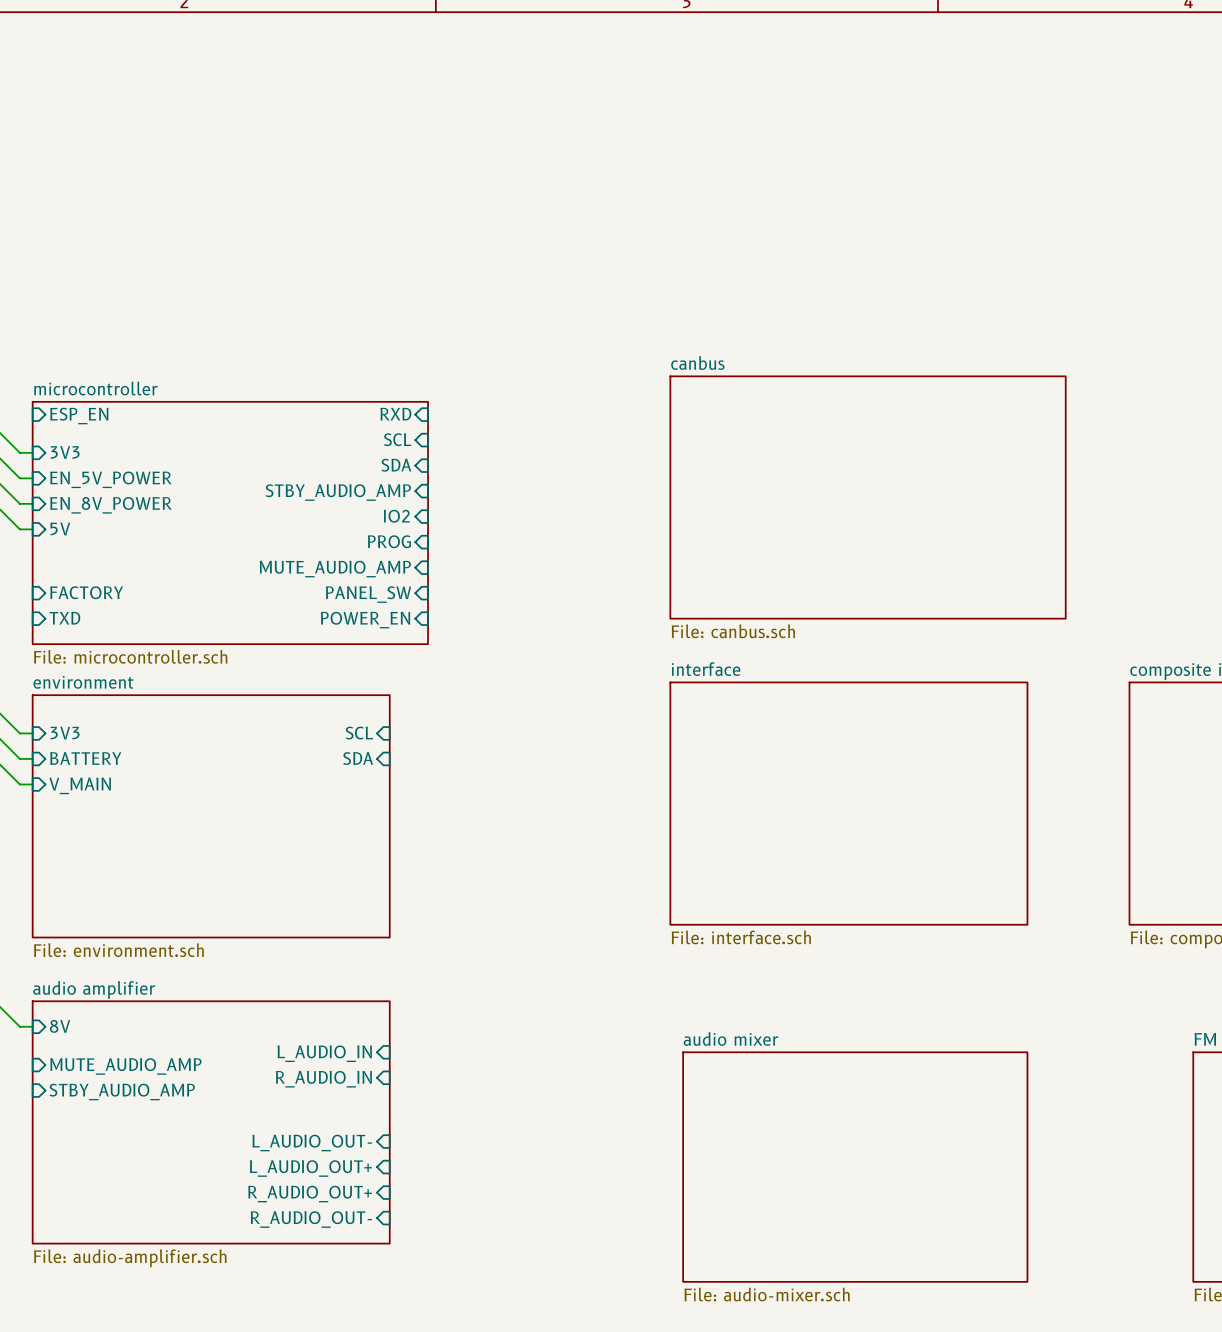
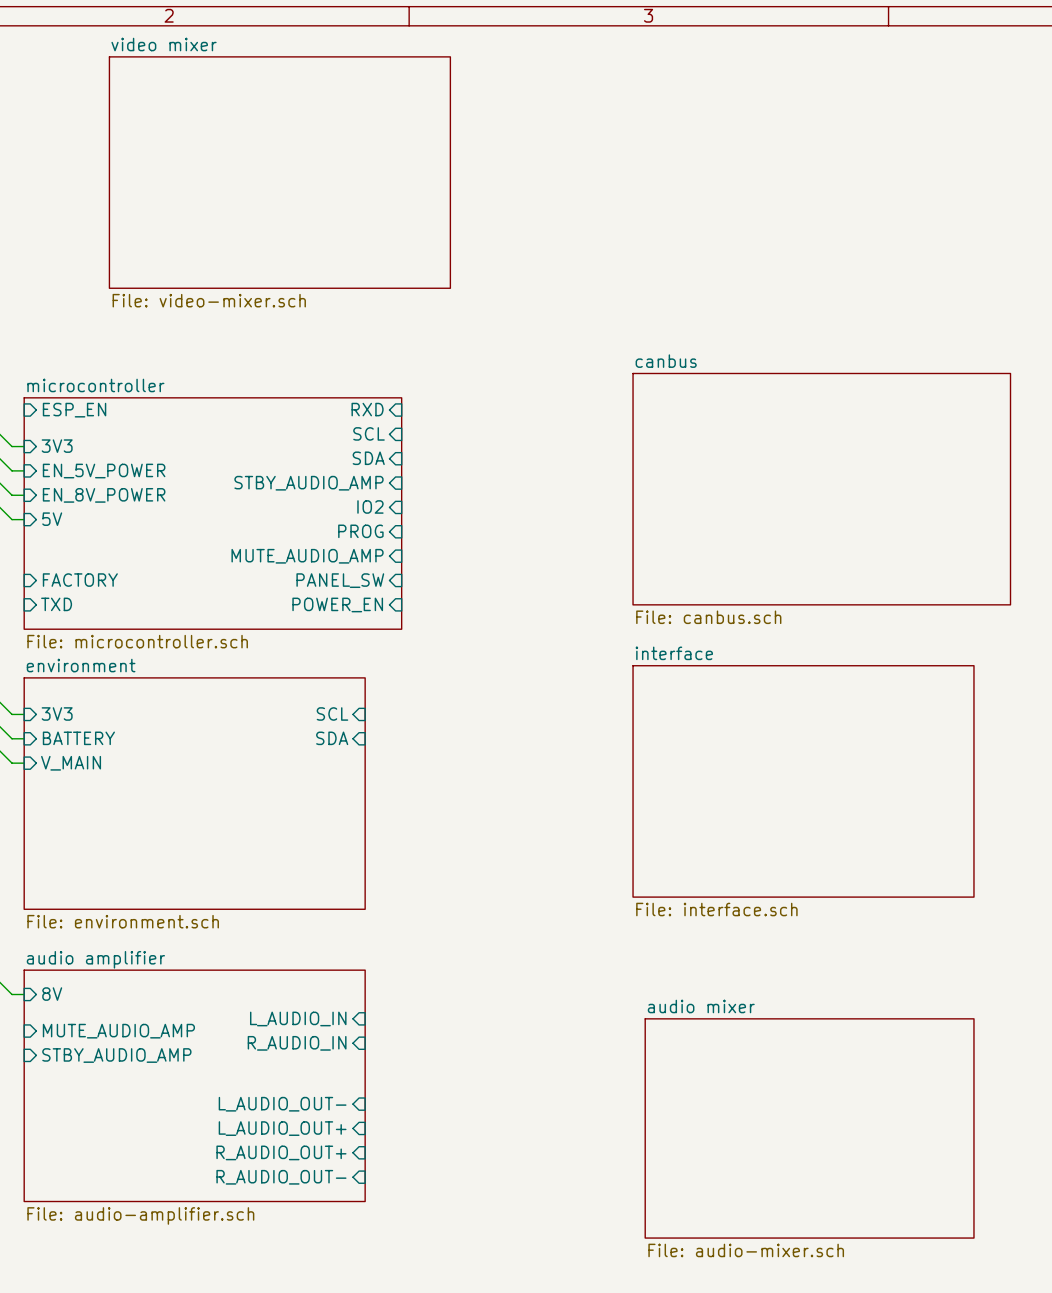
sheet video mixer: none -> File: video-mixer.sch (279, 172)

